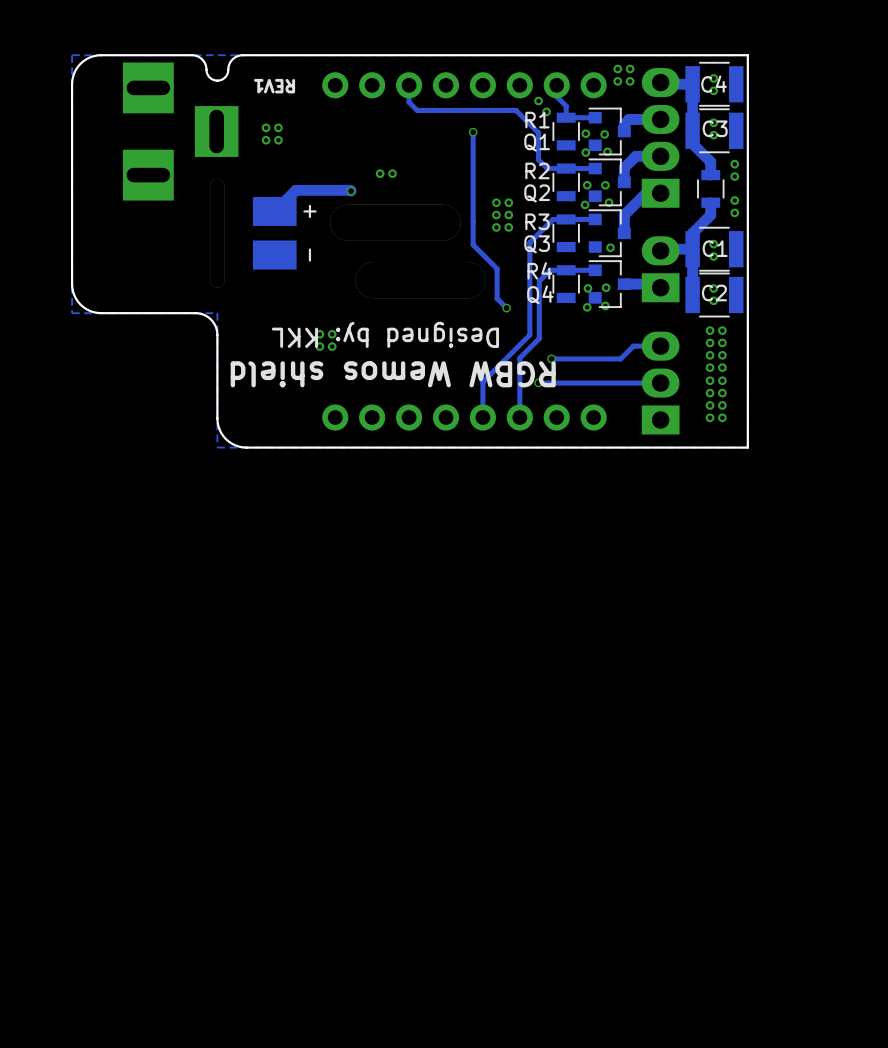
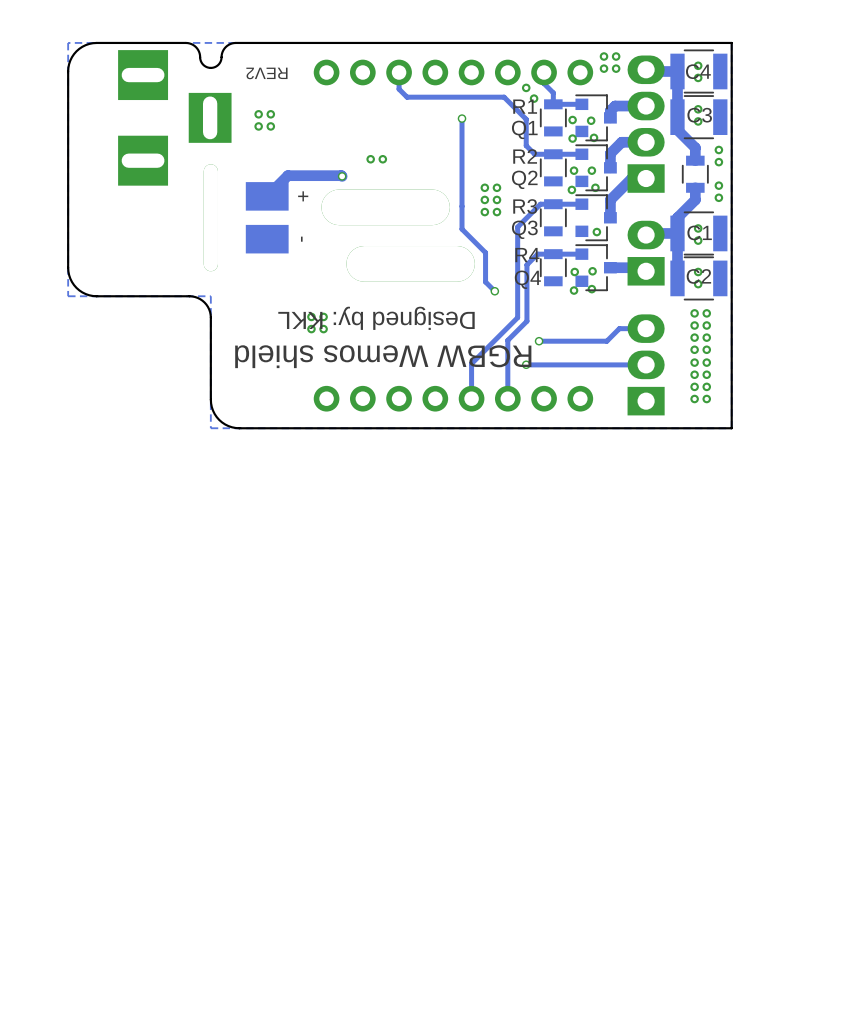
text: REV1 (274, 86) -> REV2 (266, 73)

